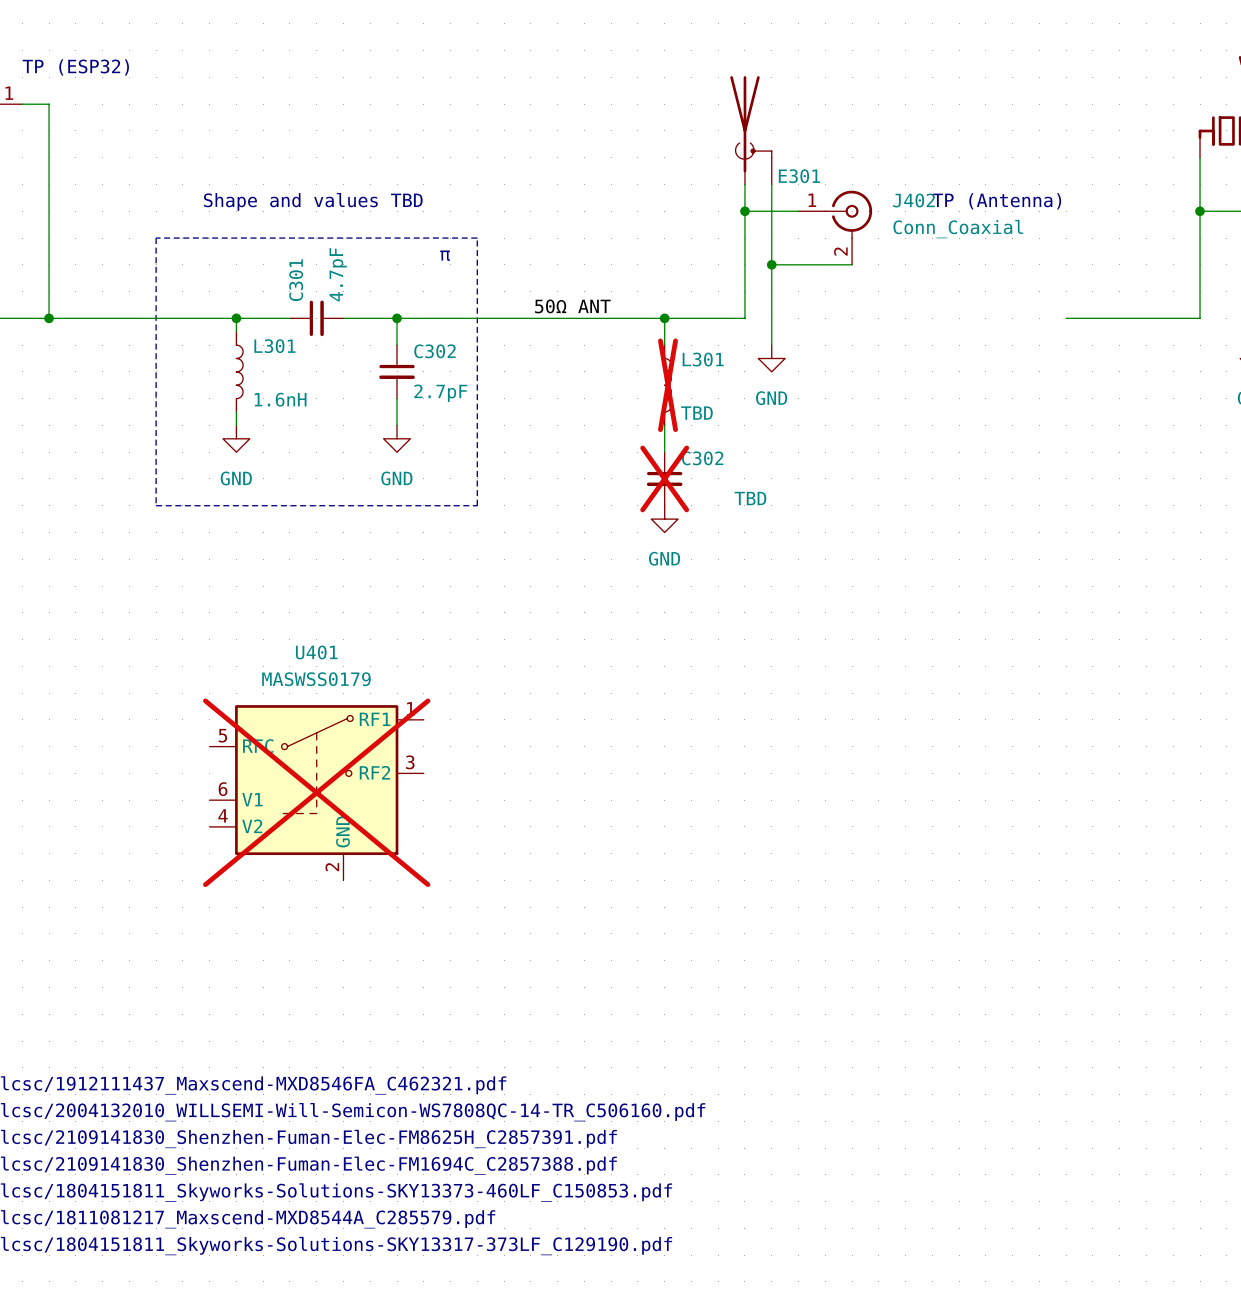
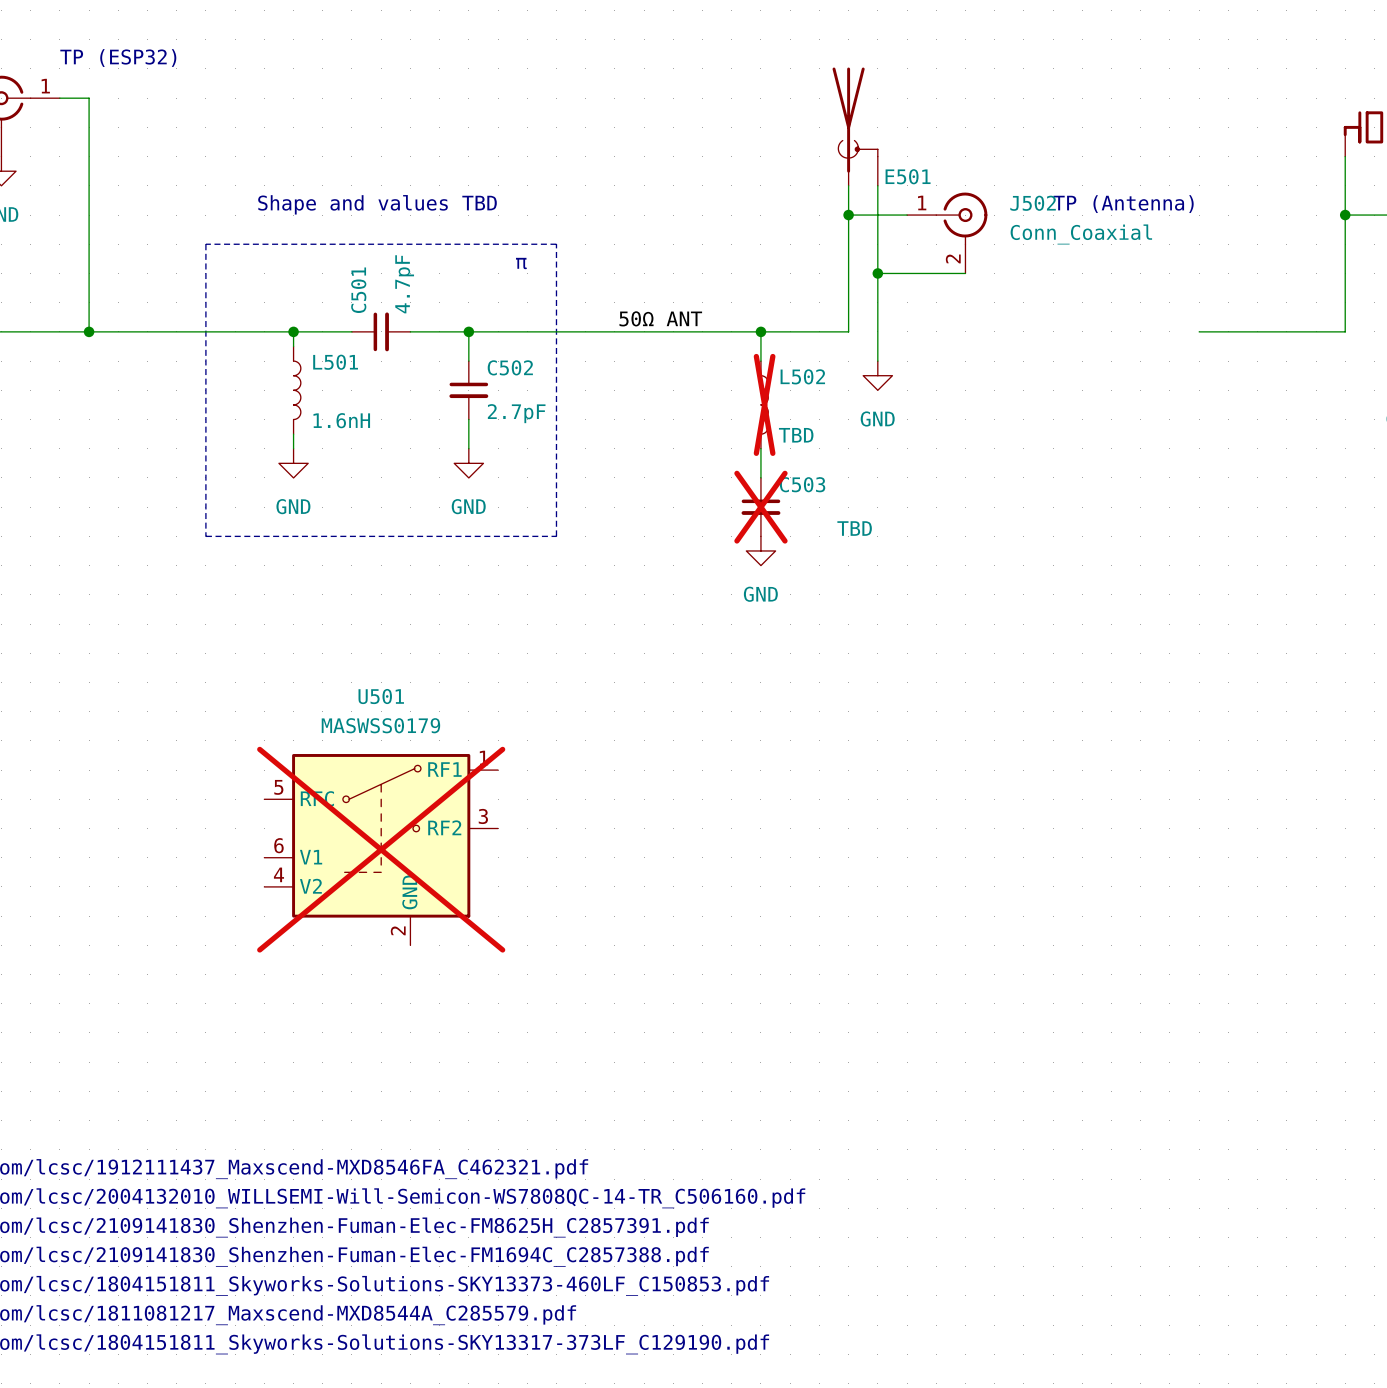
E301 name: E301 (799, 176) -> E501 (908, 176)
J402 name: J402 (914, 200) -> J502 (1033, 203)
C301 name: C301 (296, 280) -> C501 (358, 290)
L301 name: L301 (274, 346) -> L501 (335, 362)
C302 name: C302 (435, 351) -> C502 (510, 367)
L301 name: L301 (703, 359) -> L502 (802, 376)
C302 name: C302 (702, 458) -> C503 (802, 484)
U401 name: U401 (316, 652) -> U501 (381, 696)

